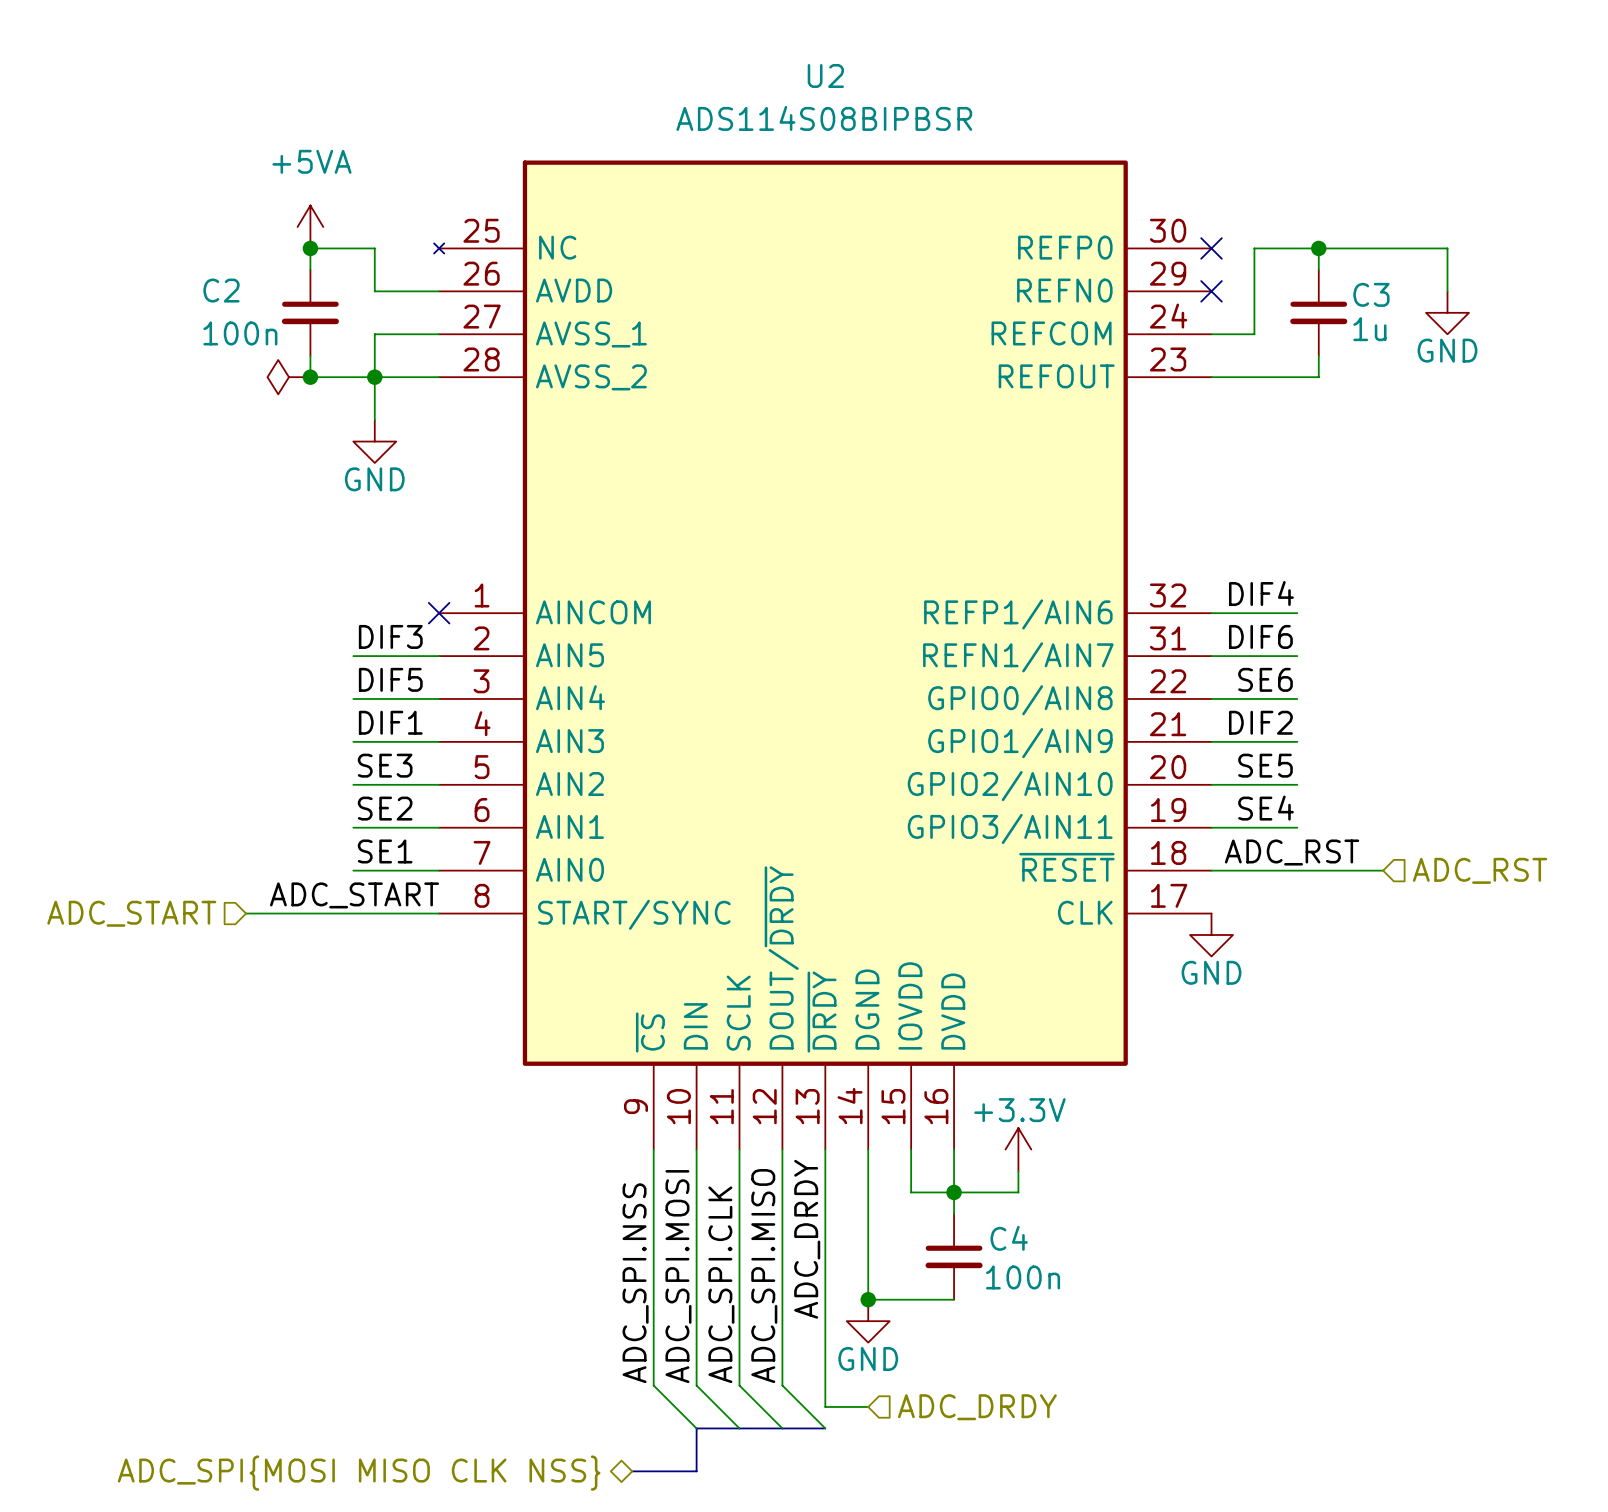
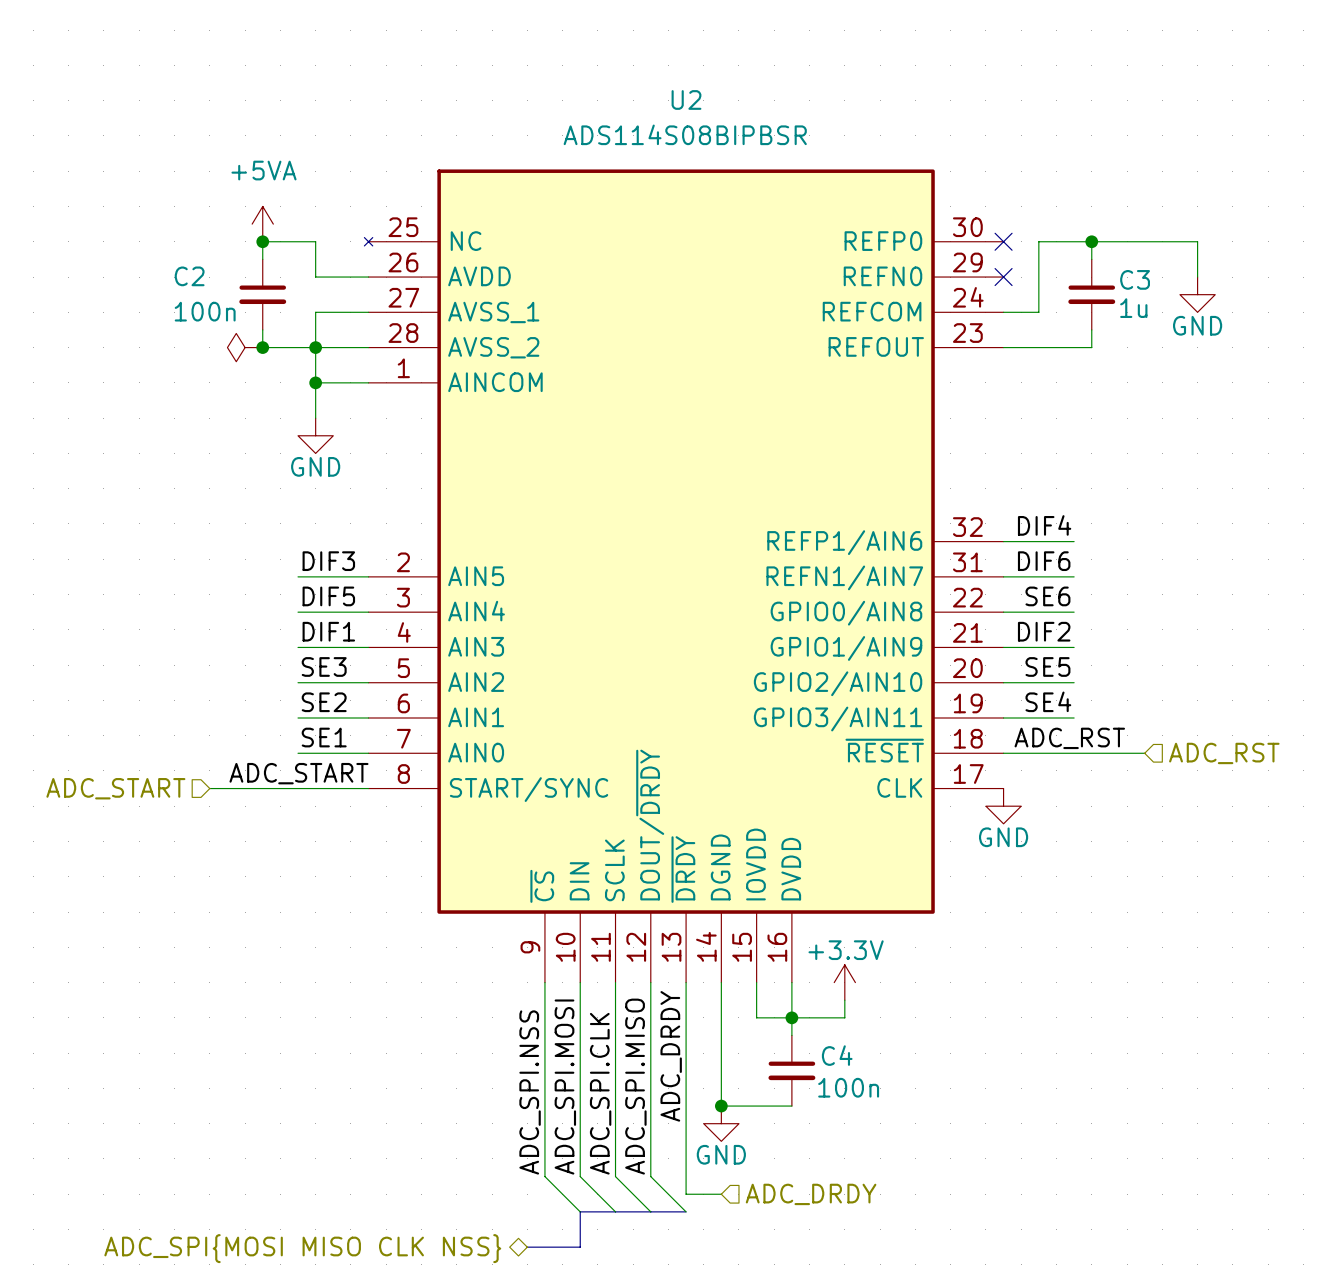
U2 symbol: [434, 160, 1212, 1150] -> [364, 169, 1004, 983]
junction: none -> (315, 382)
wire: none -> (368, 382) (315, 382) (315, 418)
power symbol position: GND (374, 441) -> GND (315, 435)
no-connect mark: (439, 613) -> none

